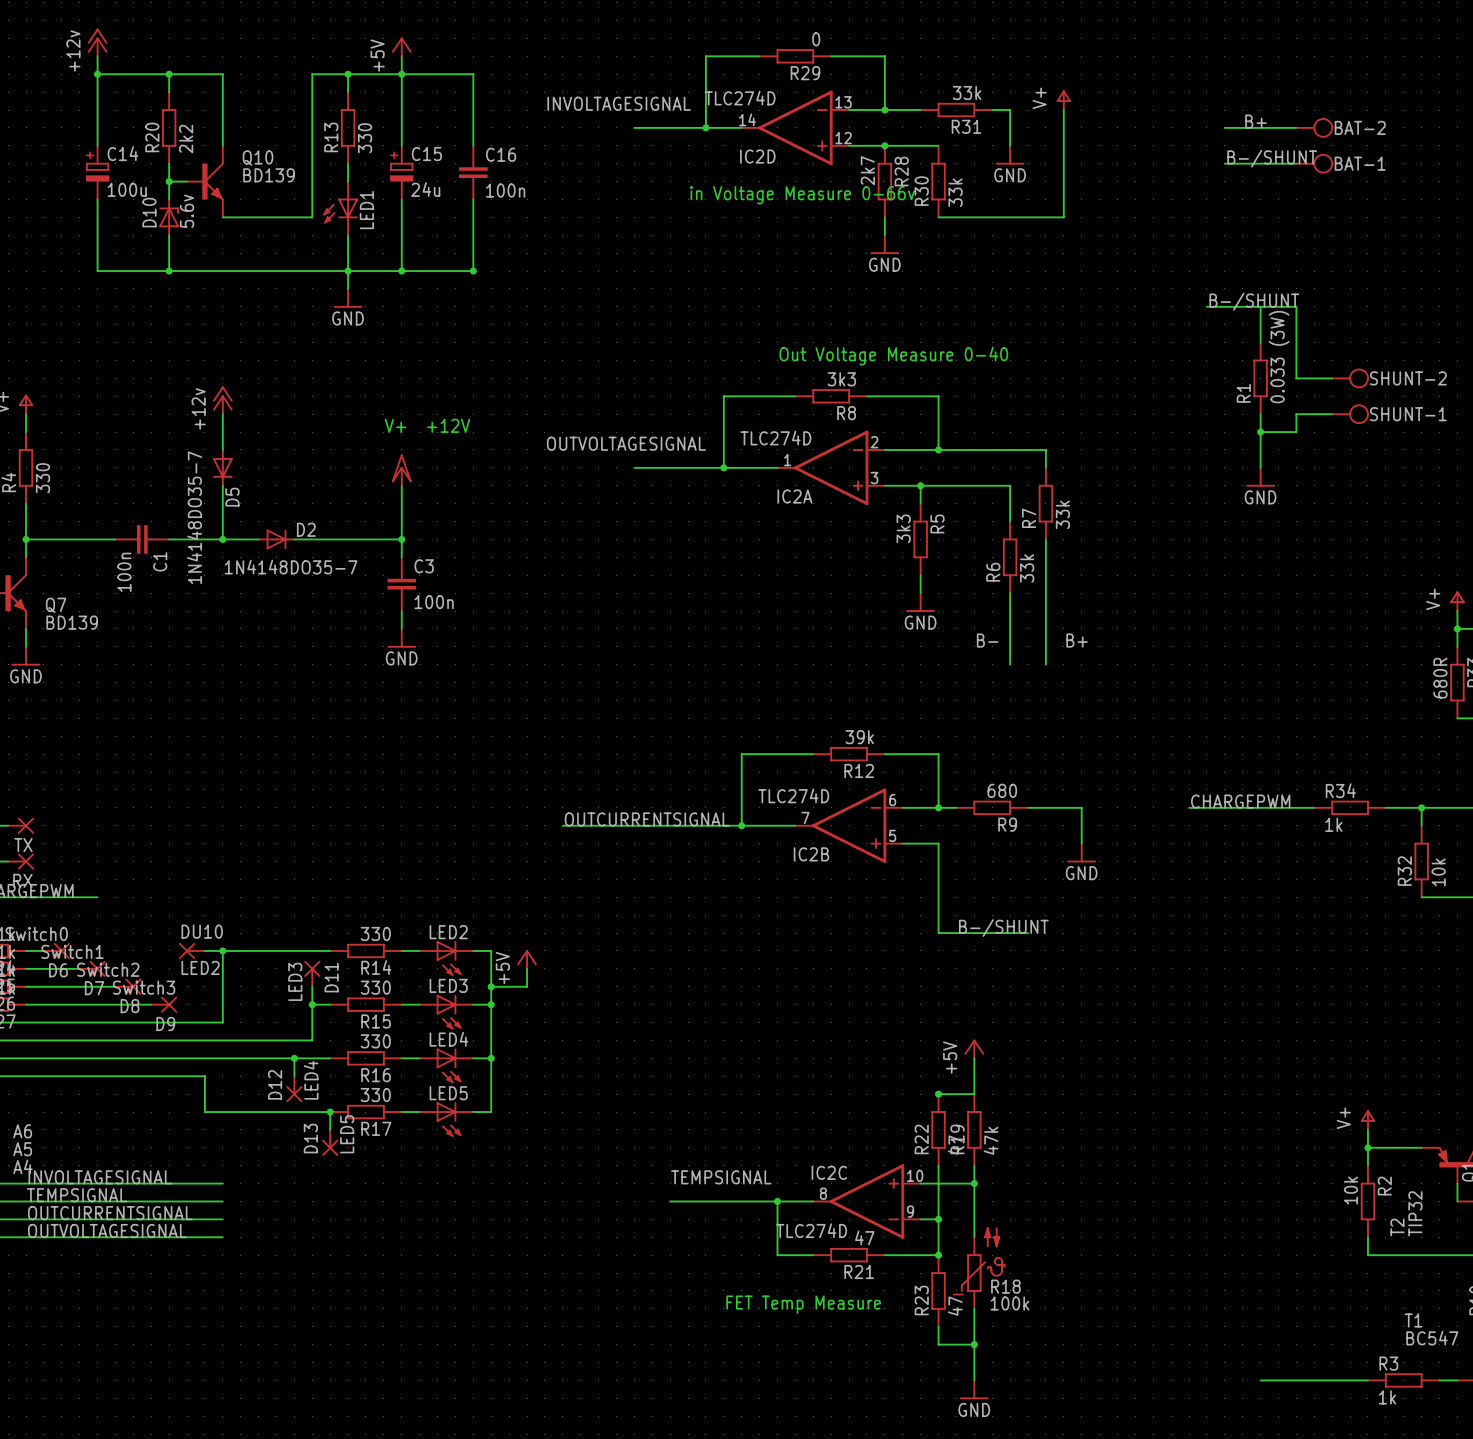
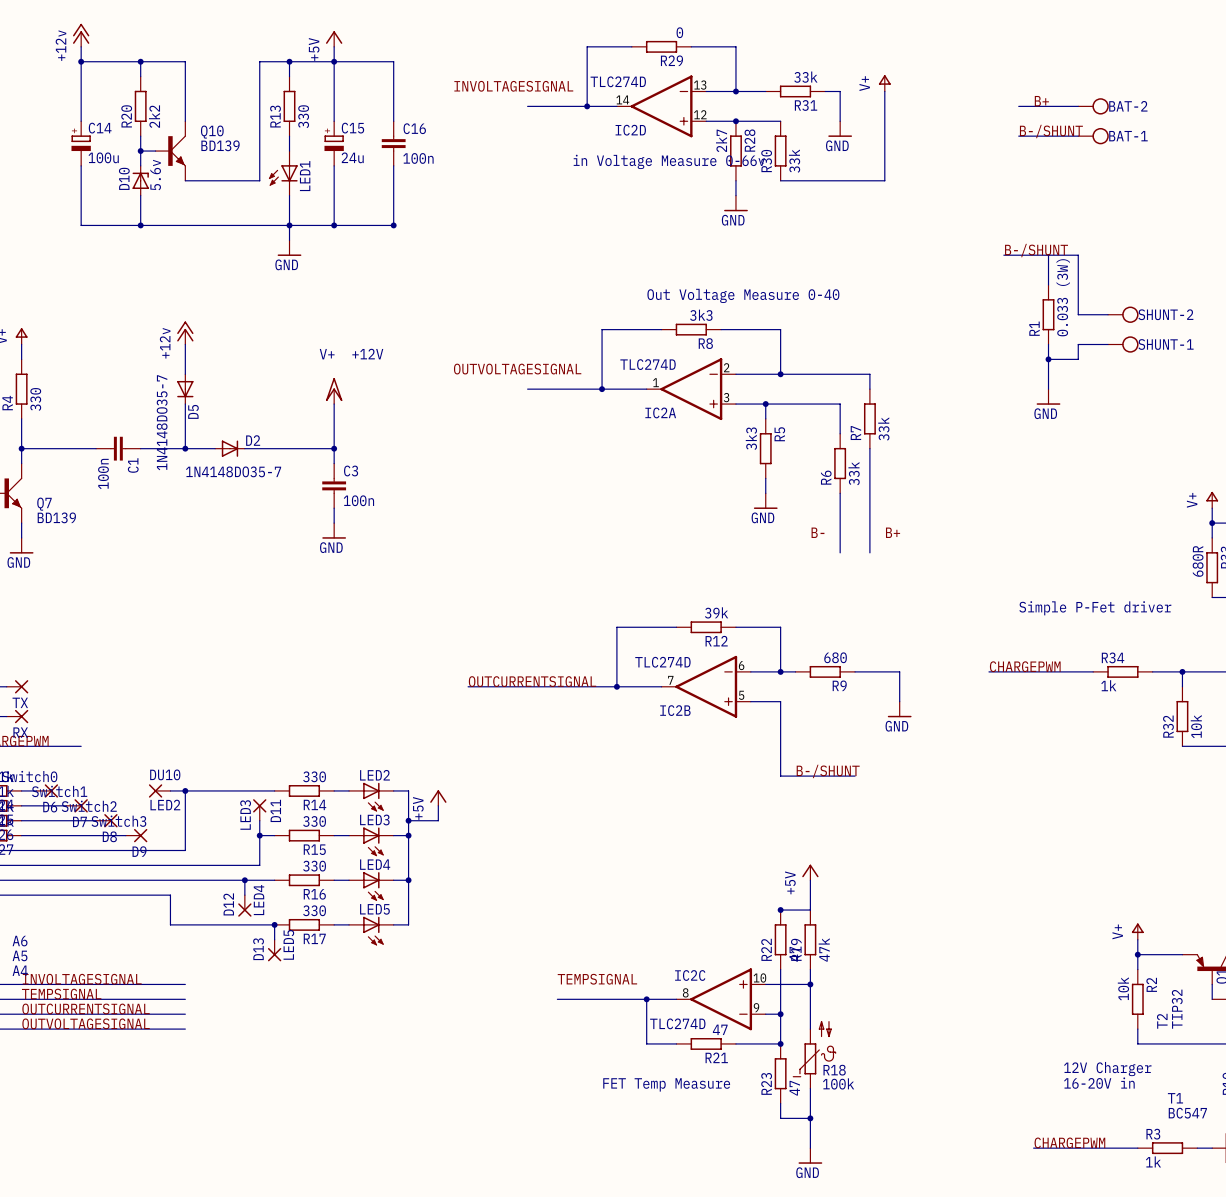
text: none -> Simple P-Fet driver (1095, 608)
text: none -> 12V Charger (1107, 1069)
text: none -> 16-20V in (1099, 1083)
label: none -> CHARGEPWM (1069, 1142)
wire: none -> (1033, 1148) (1048, 1148)

